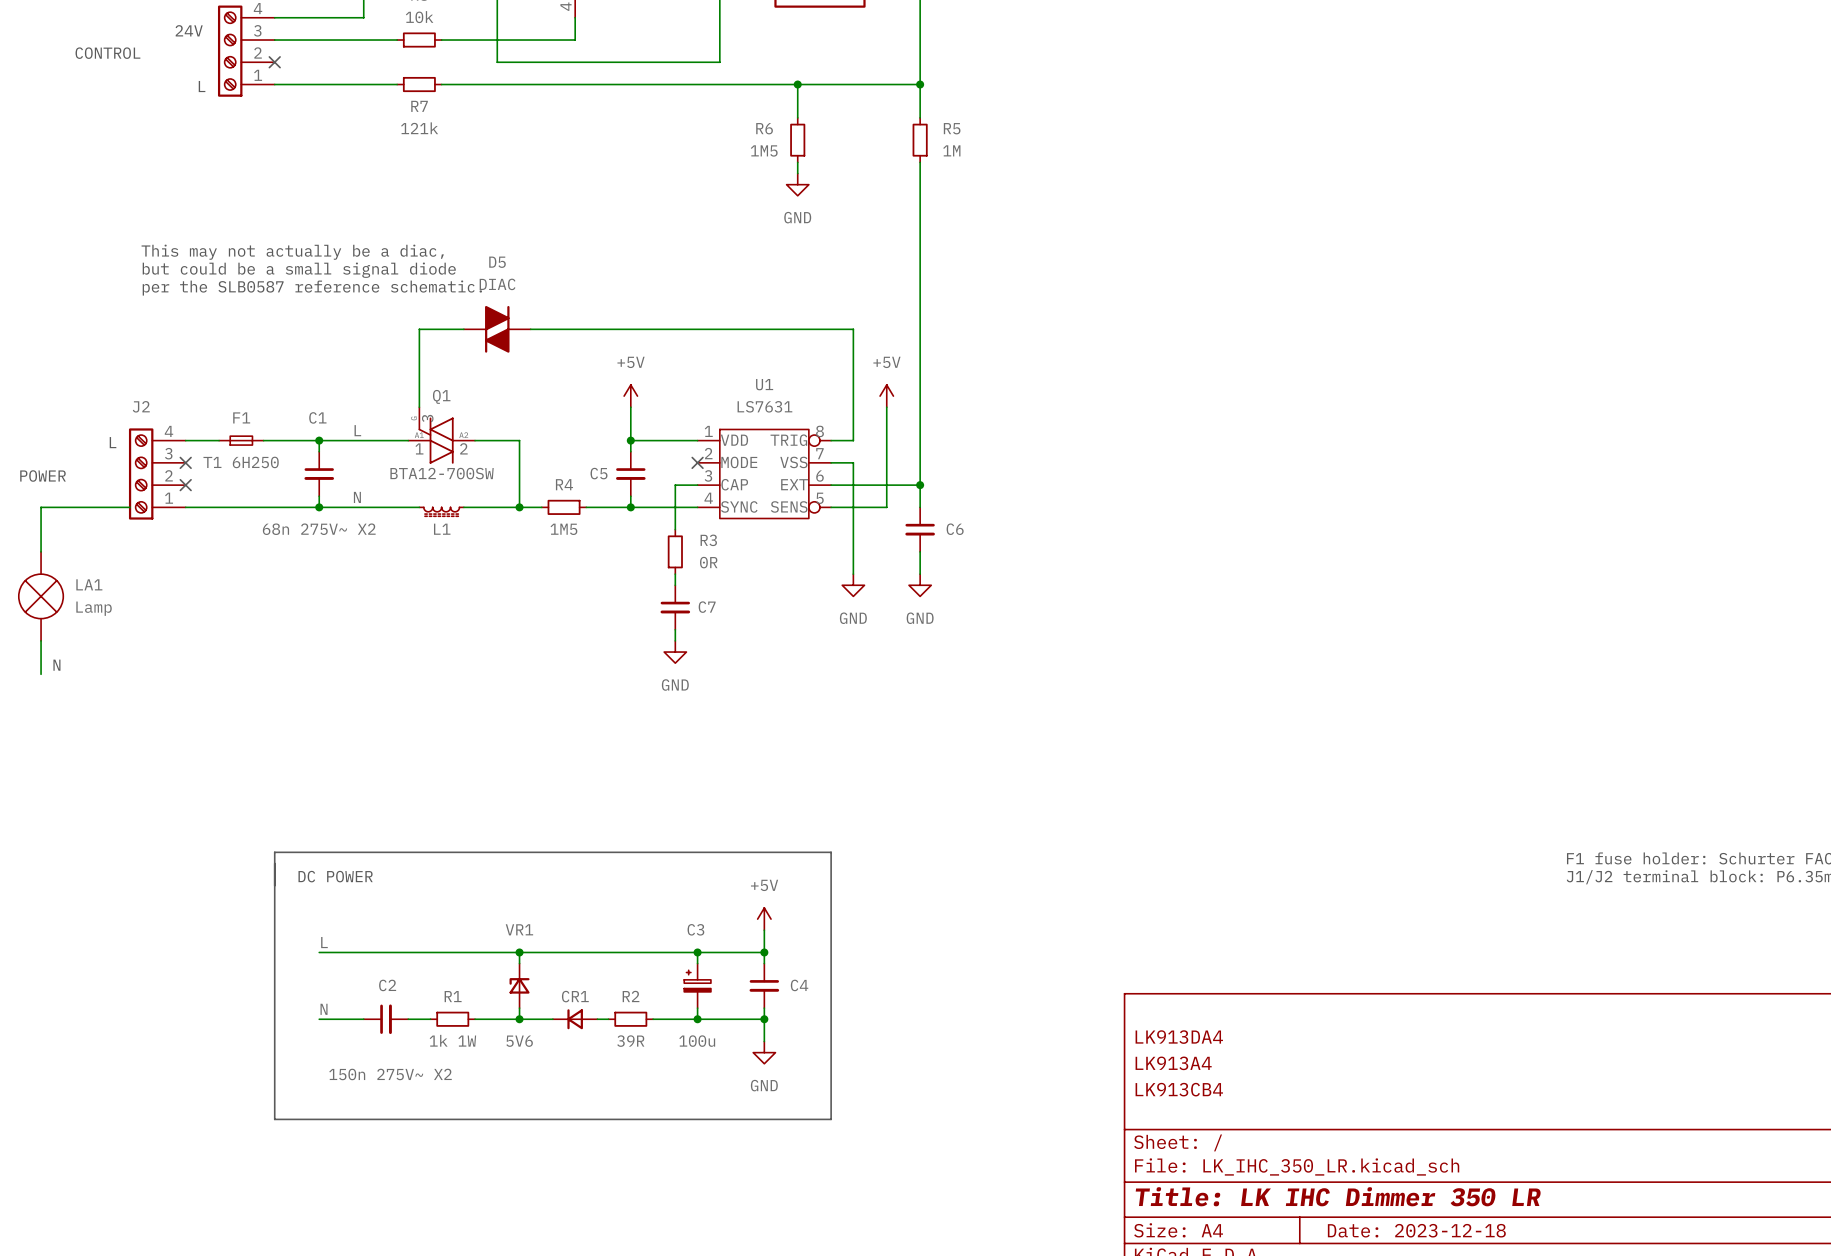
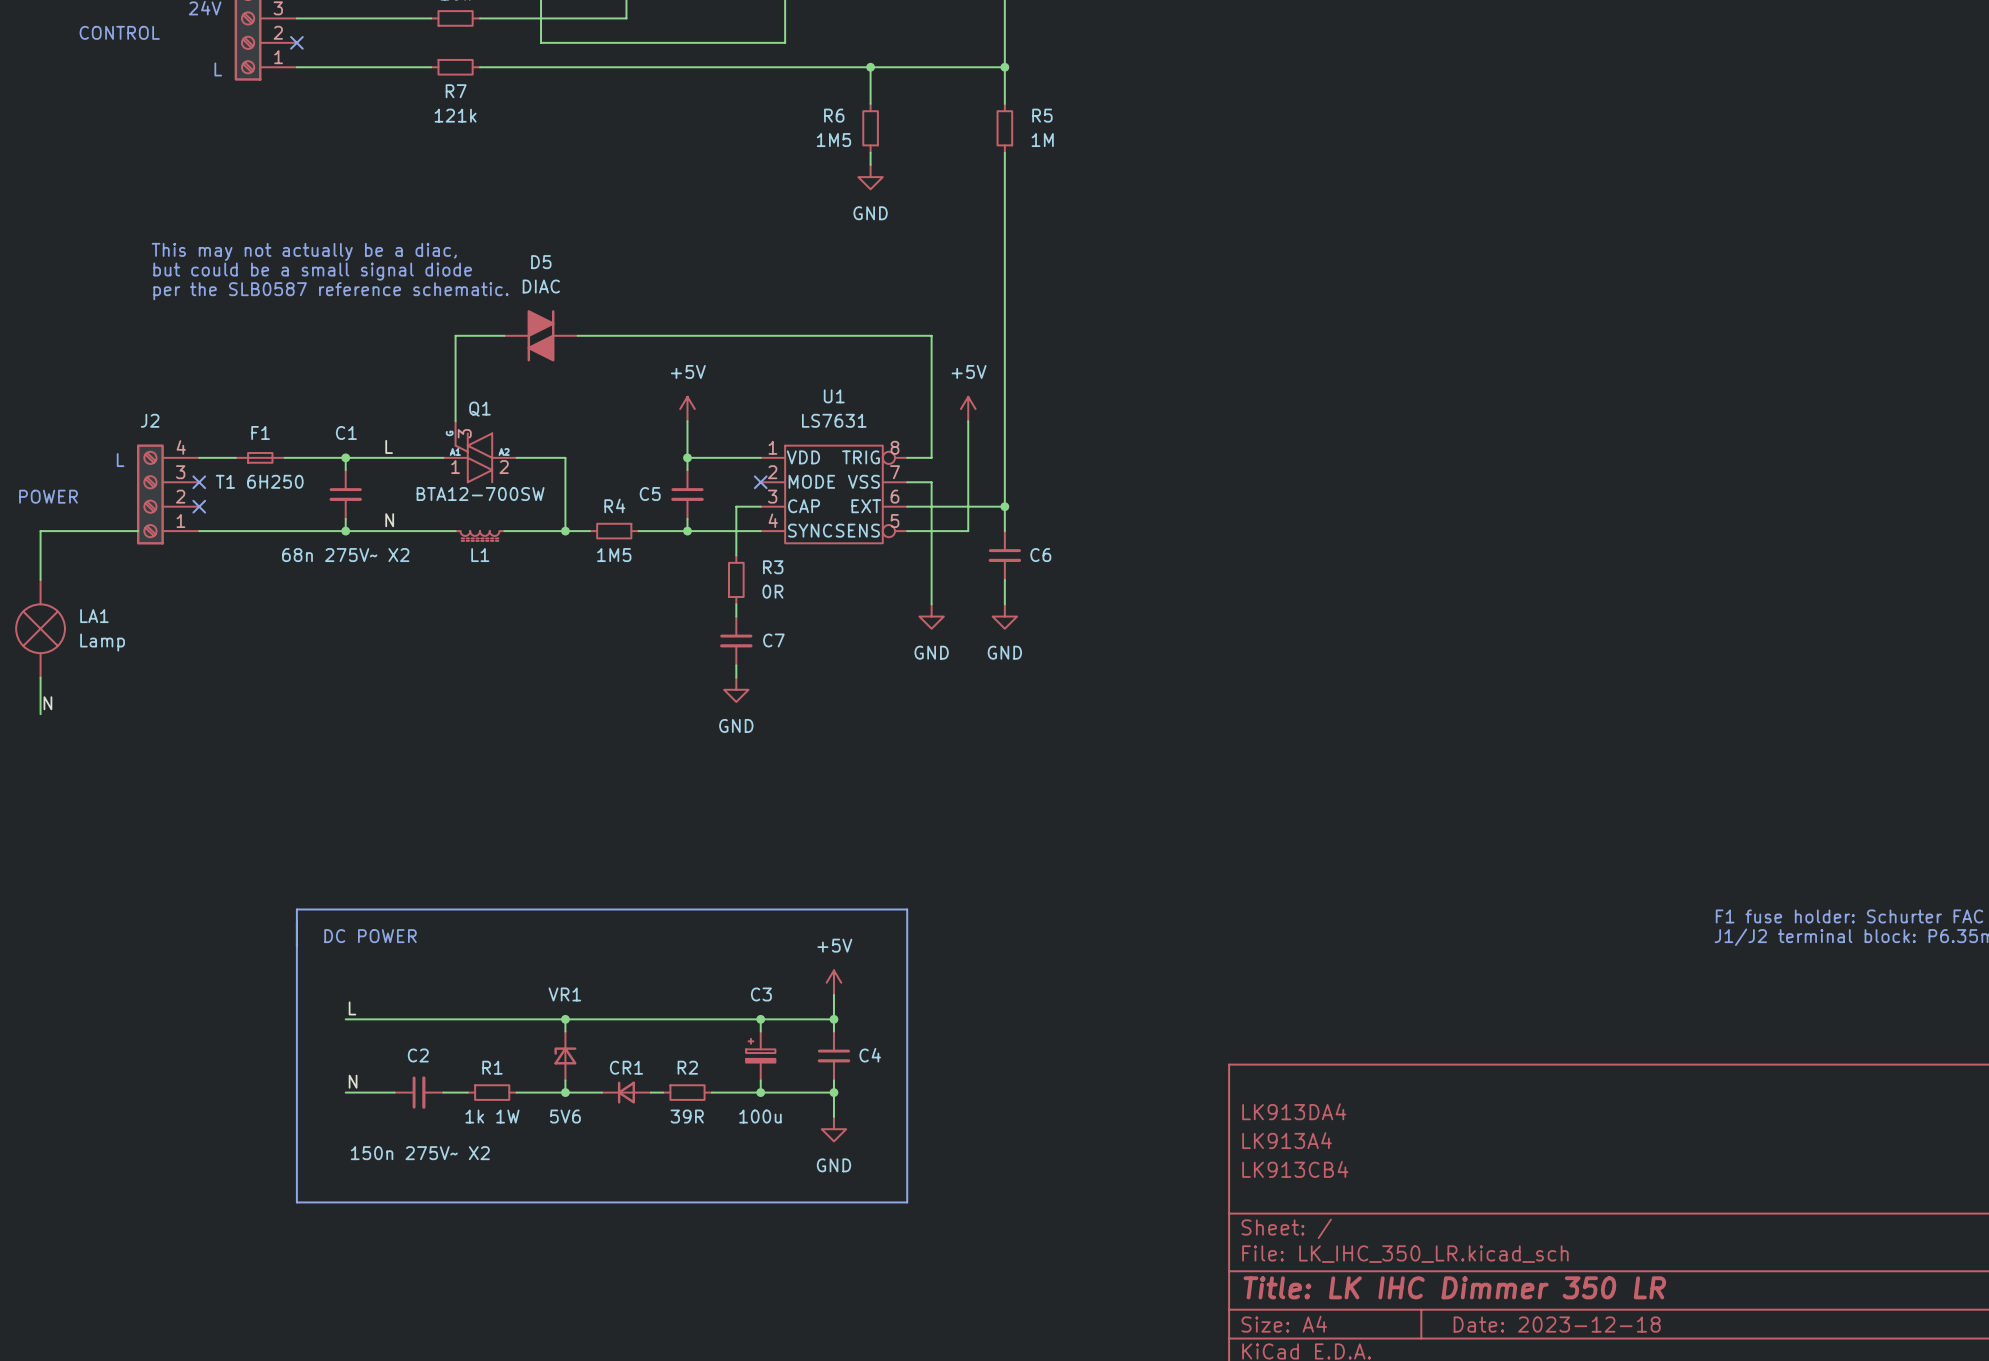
label: none -> N (47, 703)
text: N (56, 665) -> none

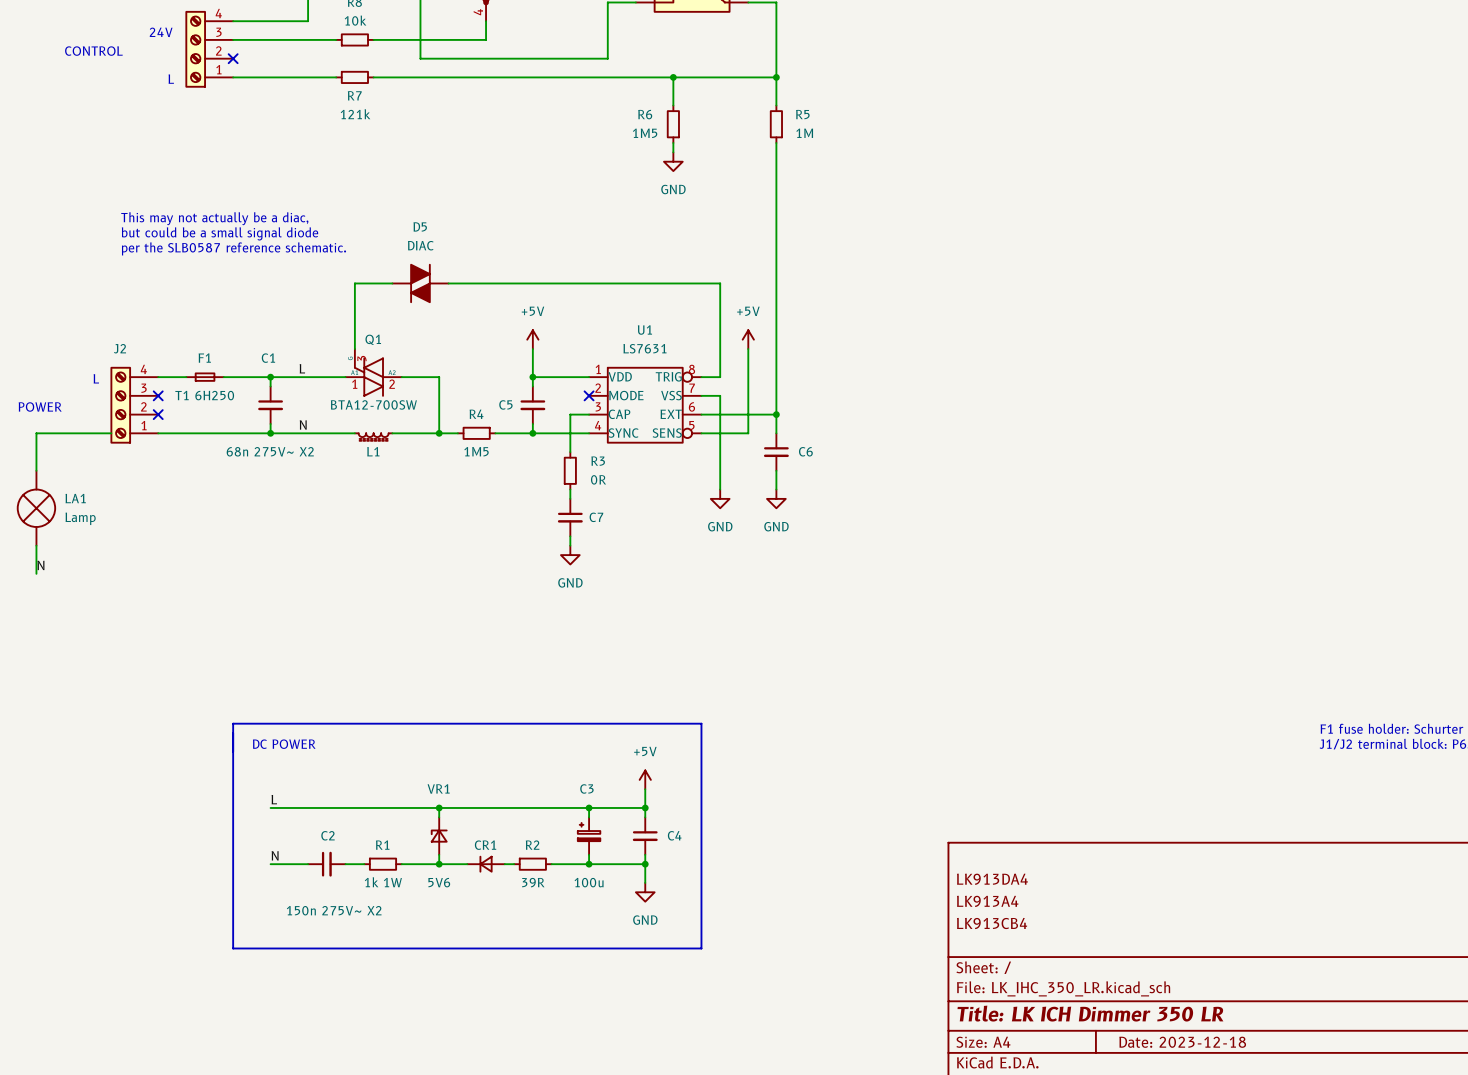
title block: Title: LK IHC Dimmer 350 LR (1454, 1287) -> Title: LK ICH Dimmer 350 LR (1090, 1013)

